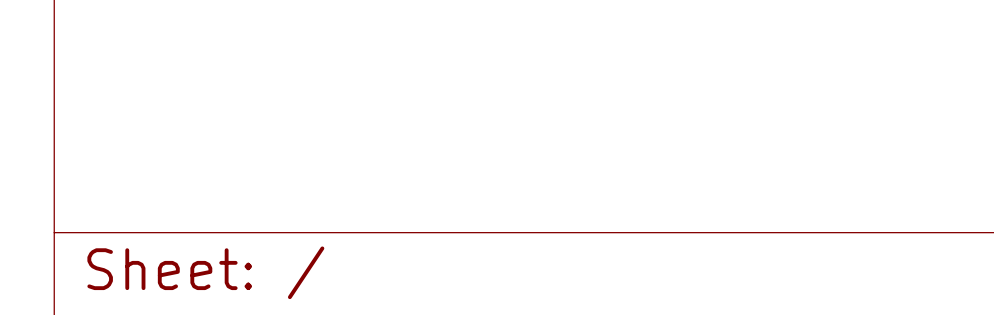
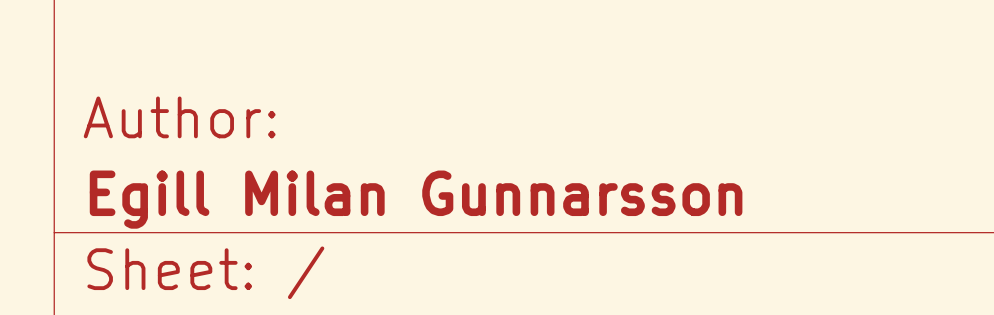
title block: none -> Author: (179, 117)
title block: none -> Egill Milan Gunnarsson (416, 199)

